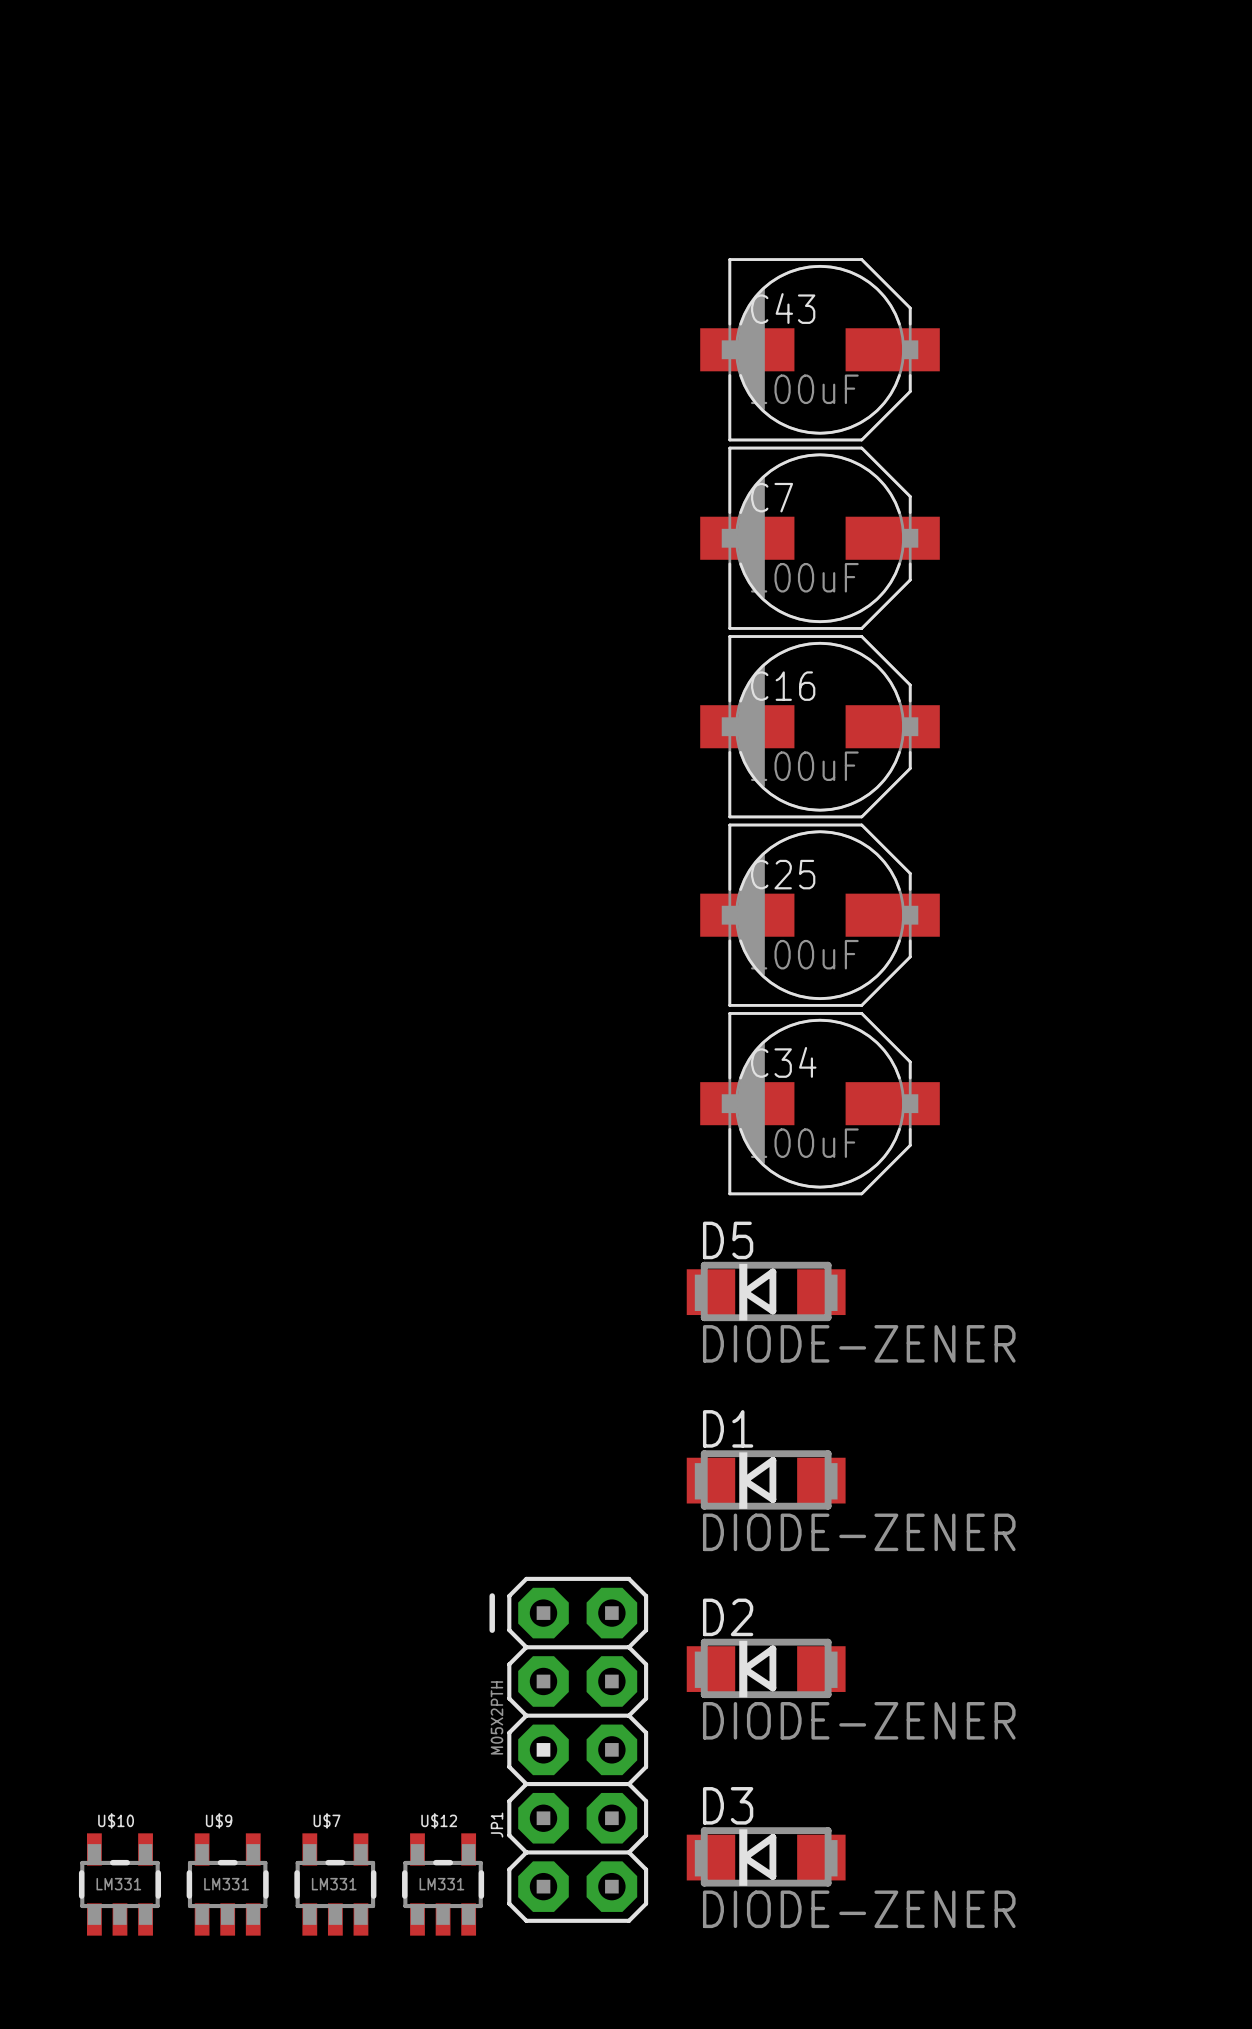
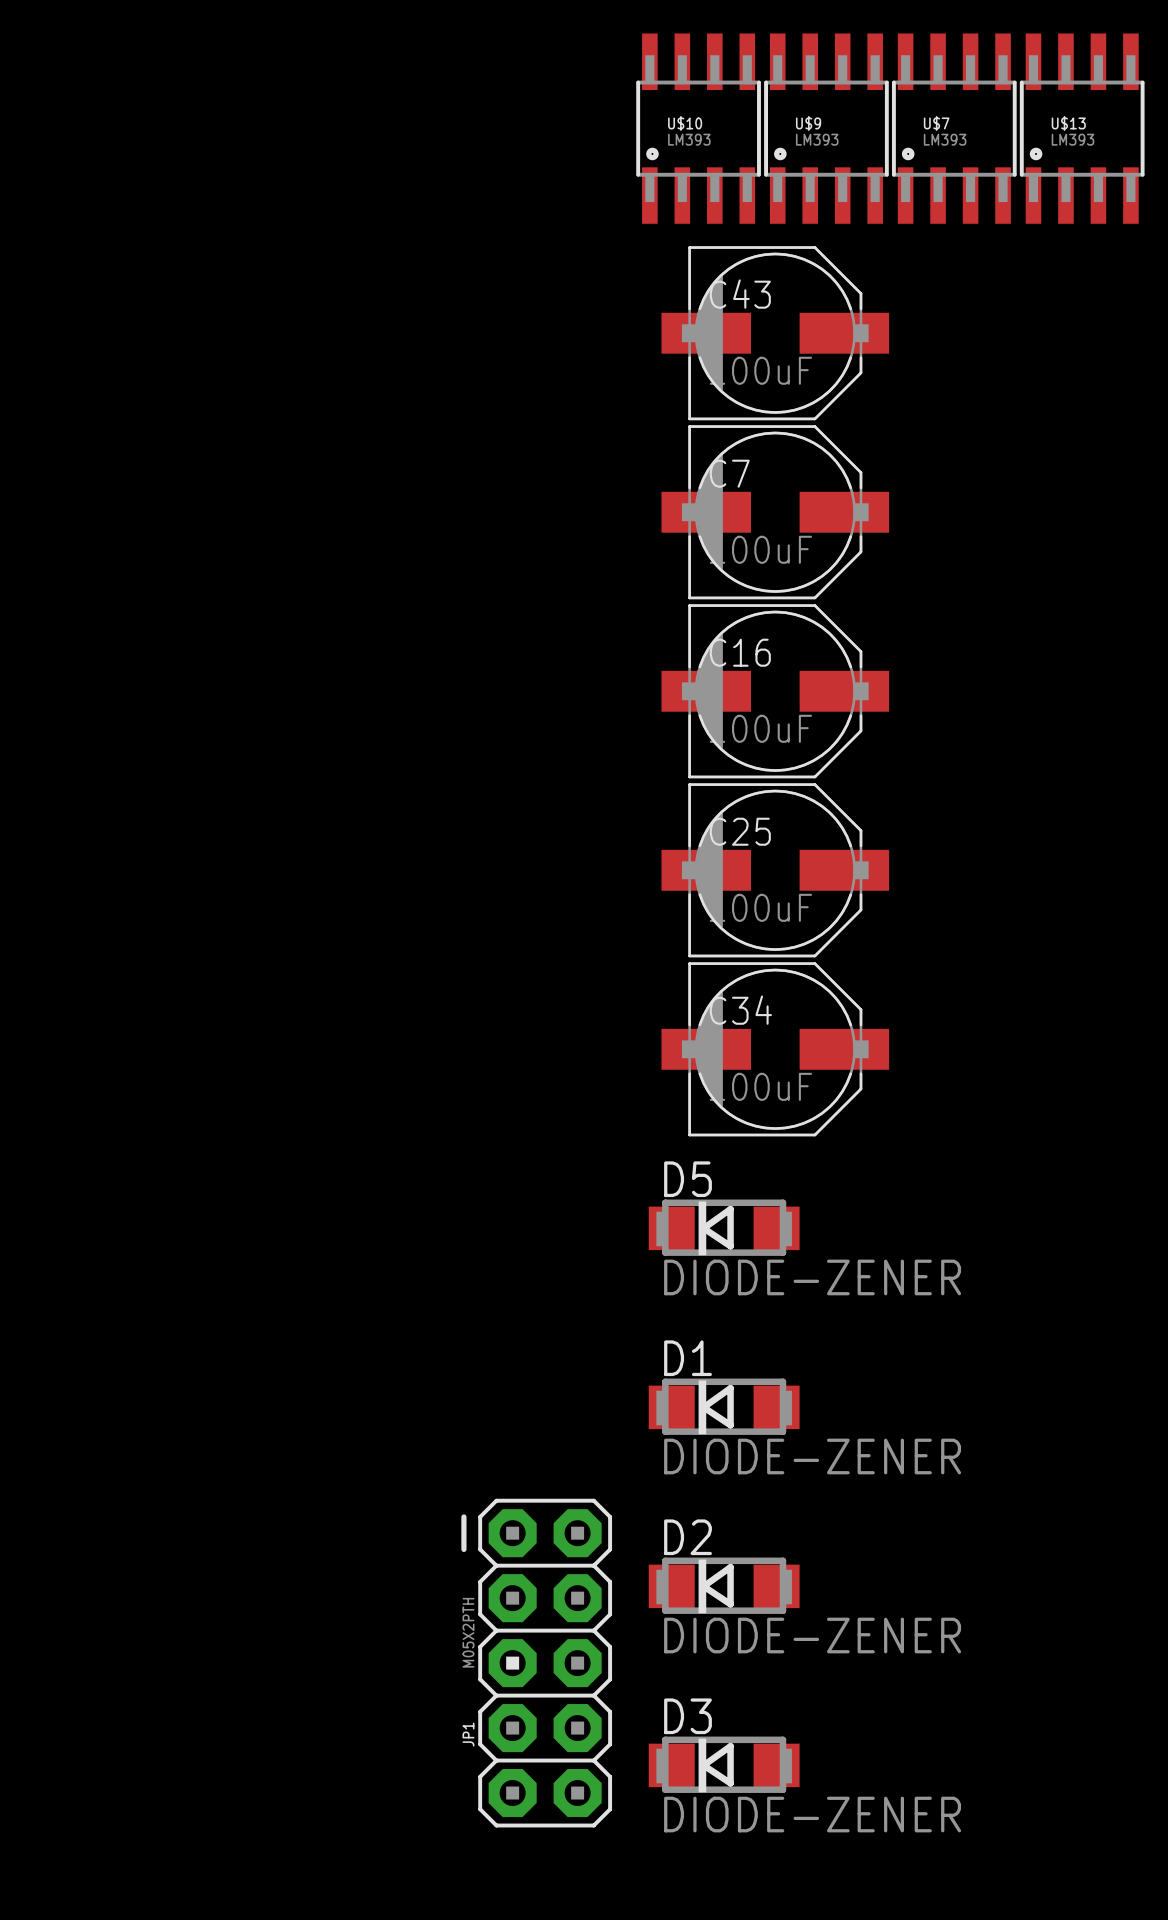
U$13: none -> LM393 (1082, 128)
U$10 name position: U$10 (116, 1820) -> U$10 (685, 123)
U$9 name position: U$9 (219, 1820) -> U$9 (808, 123)
U$7 name position: U$7 (327, 1820) -> U$7 (936, 123)
U$10 footprint: [78, 1833, 162, 1936] -> [636, 33, 761, 224]
U$9 footprint: [186, 1833, 269, 1936] -> [764, 33, 889, 224]
U$7 footprint: [294, 1833, 377, 1936] -> [891, 33, 1017, 224]
U$10 value: LM331 (118, 1884) -> LM393 (689, 139)
U$9 value: LM331 (226, 1884) -> LM393 (817, 139)
U$7 value: LM331 (334, 1884) -> LM393 (945, 139)
U$12: LM331 (443, 1884) -> none

